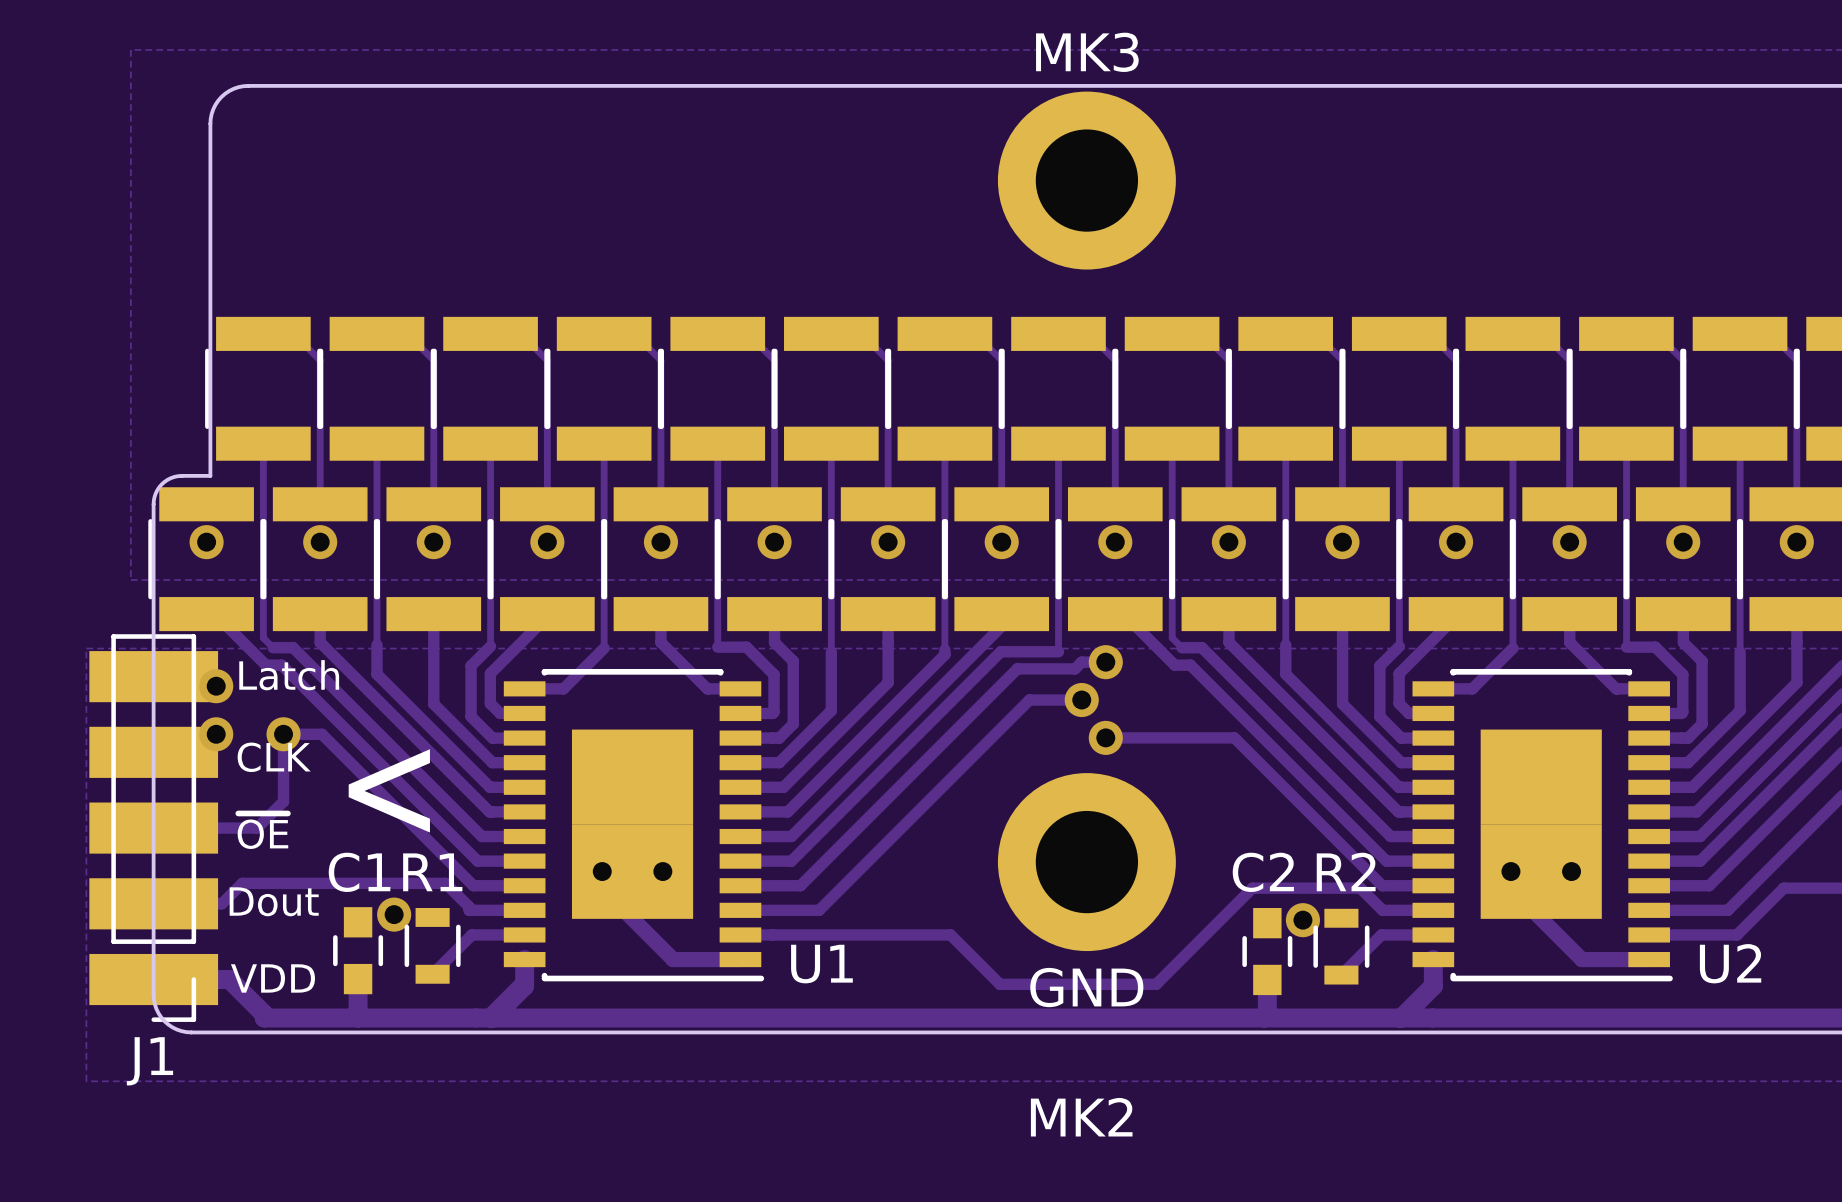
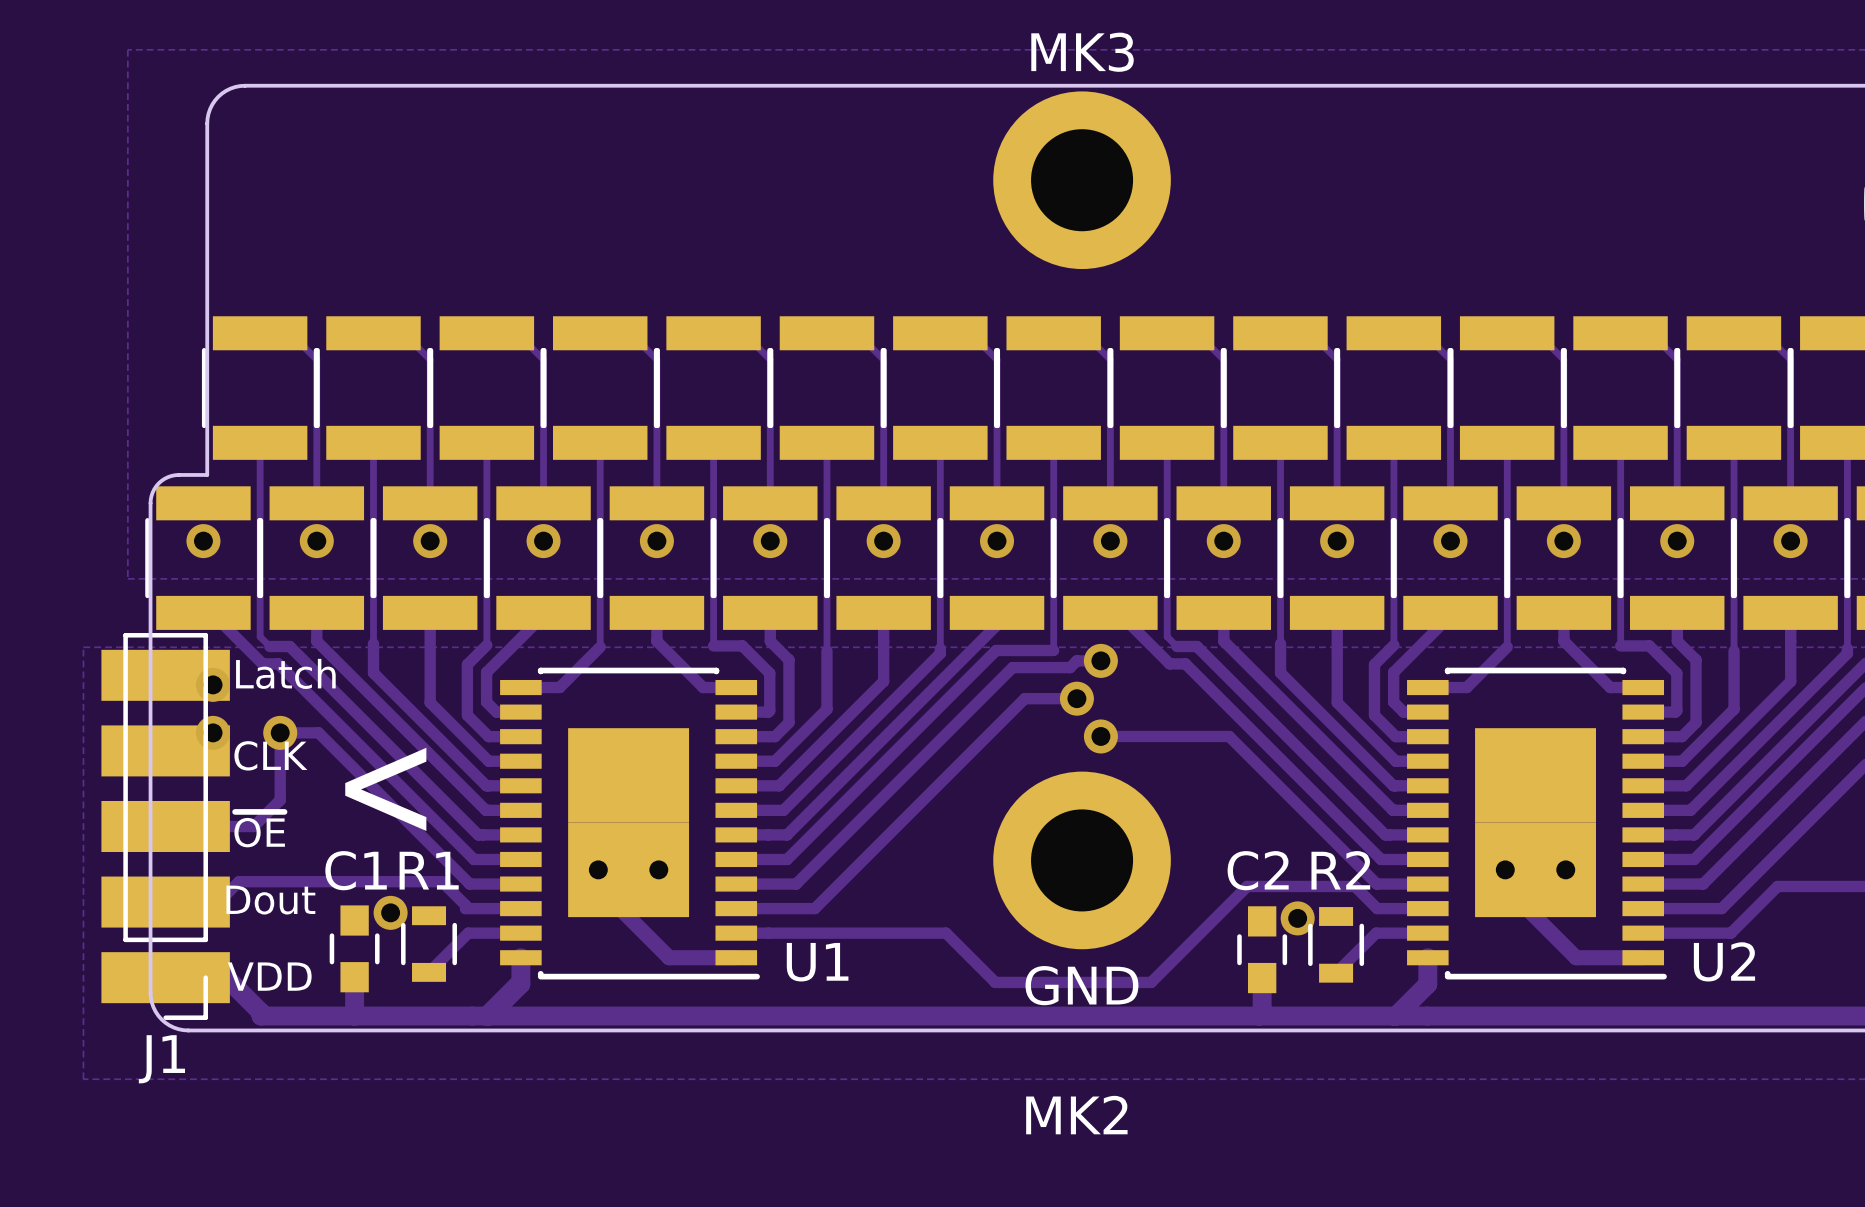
J1 position: (153, 828) -> (165, 826)

